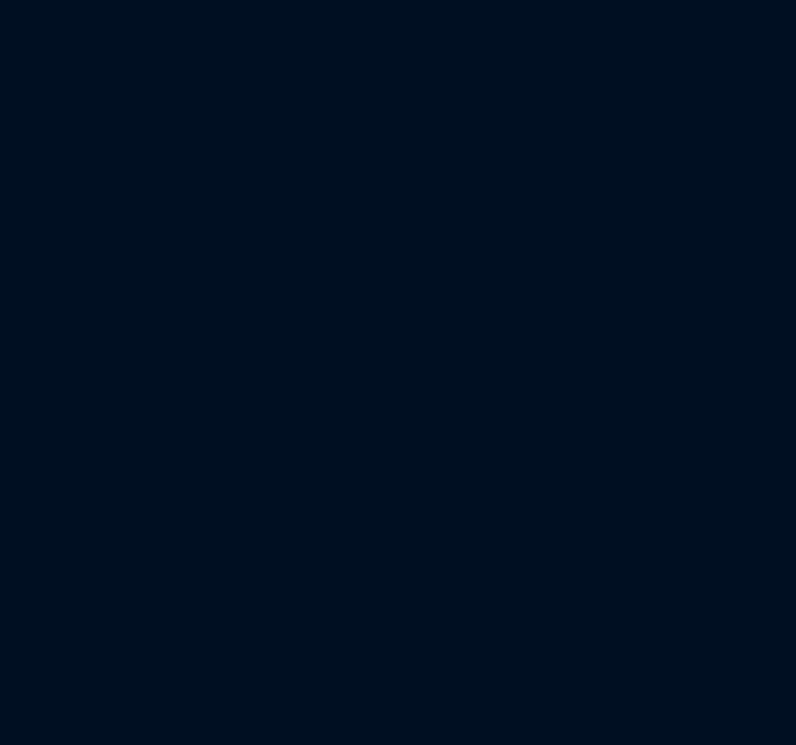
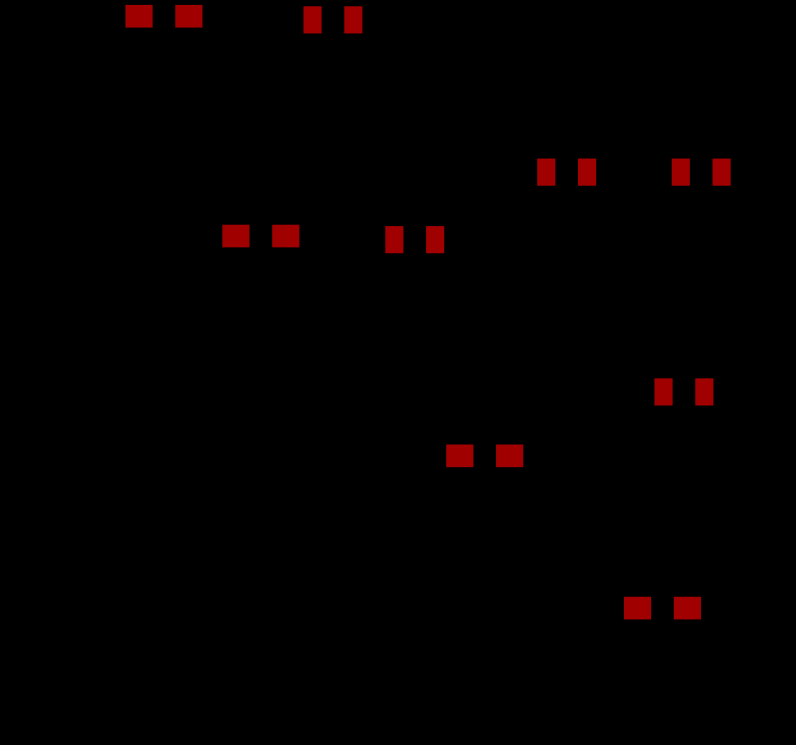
part: none -> (163, 16)
part: none -> (332, 19)
part: none -> (566, 172)
part: none -> (701, 172)
part: none -> (260, 236)
part: none -> (414, 239)
part: none -> (683, 391)
part: none -> (484, 455)
part: none -> (662, 608)

